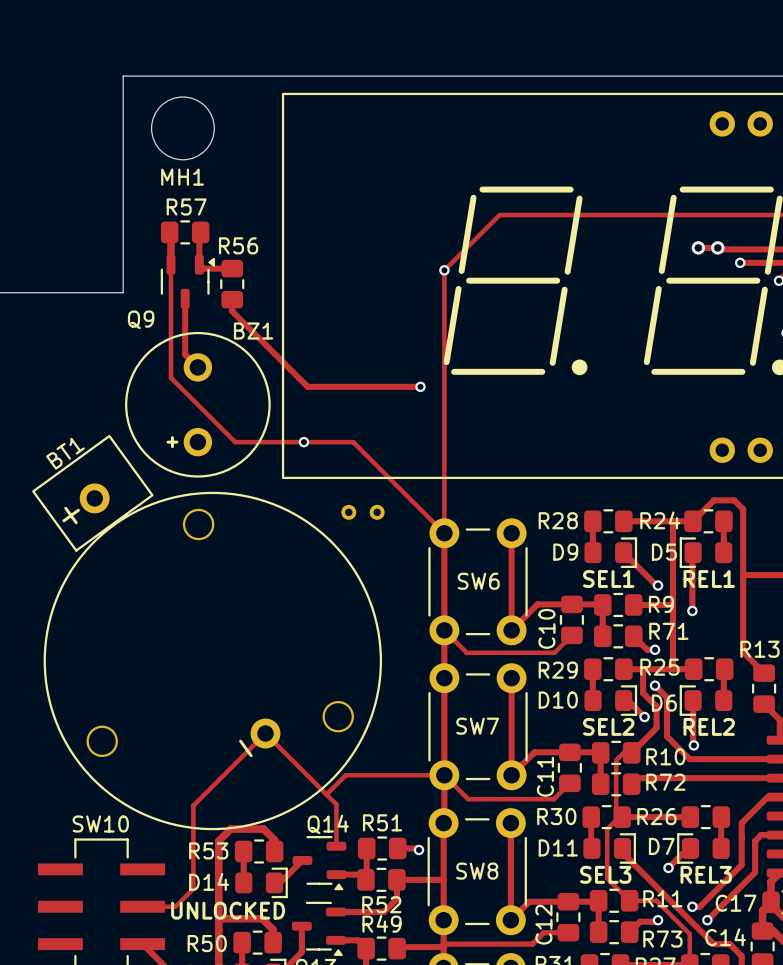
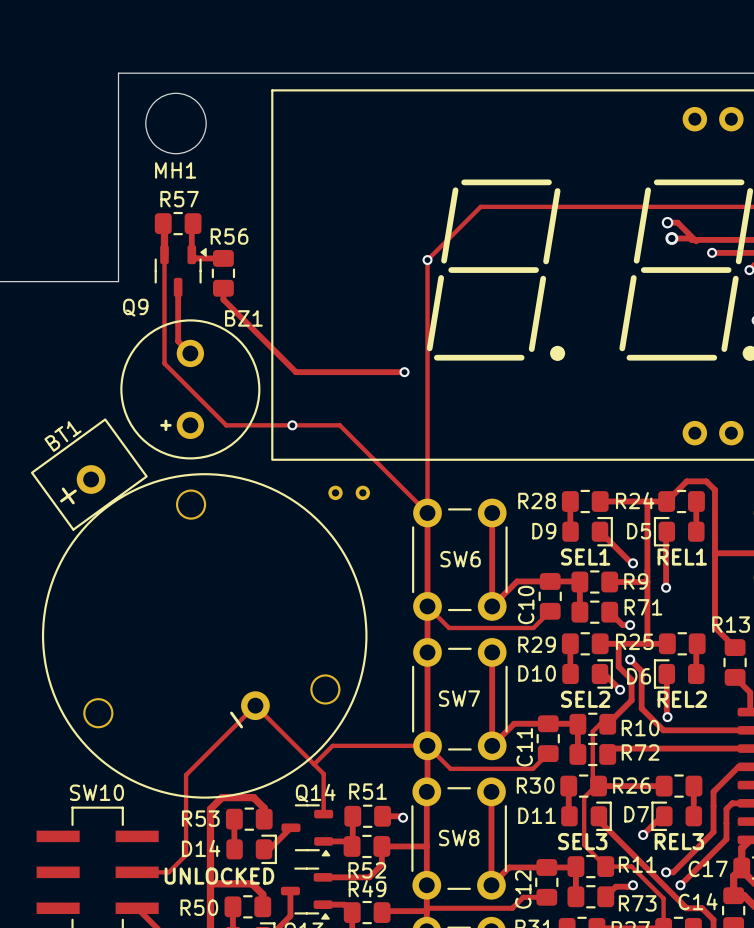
track: none -> (667, 222) (677, 222) (696, 241)
via: none -> (667, 222)
via: (717, 247) -> none

